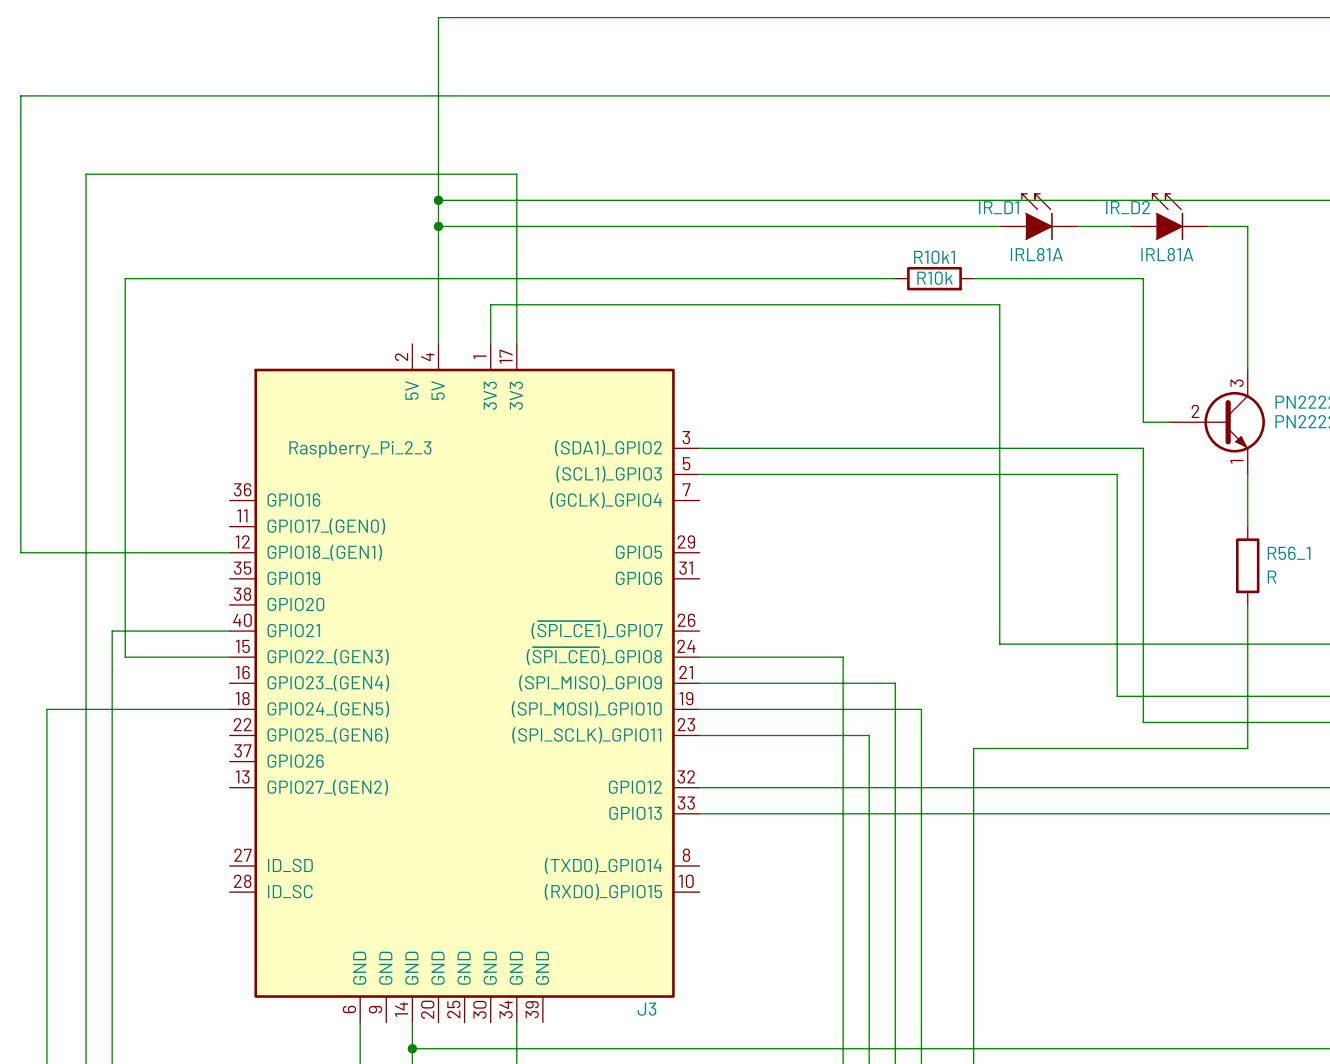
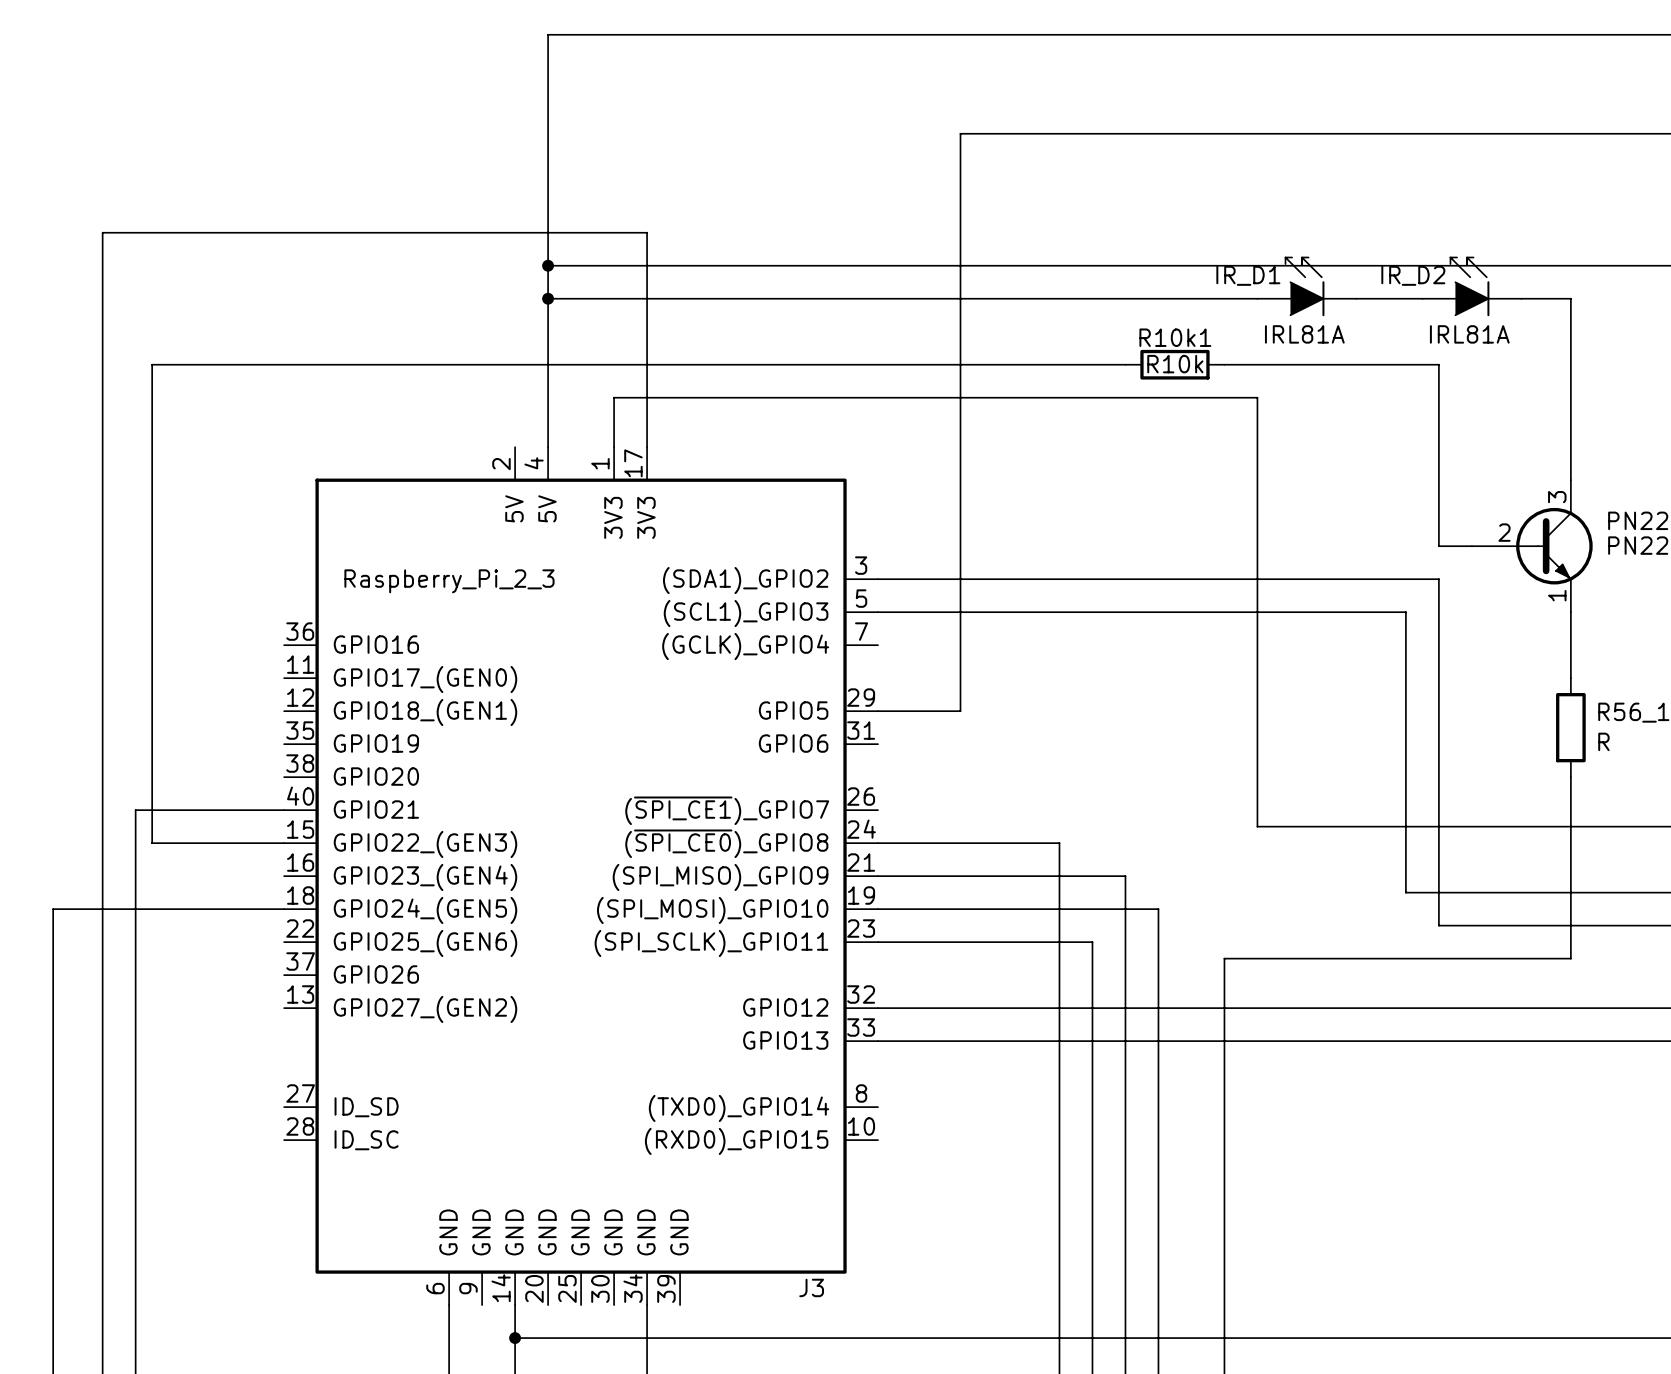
wire: (764, 95) (20, 95) (20, 552) (229, 552) -> (960, 133) (960, 711) (878, 711)

